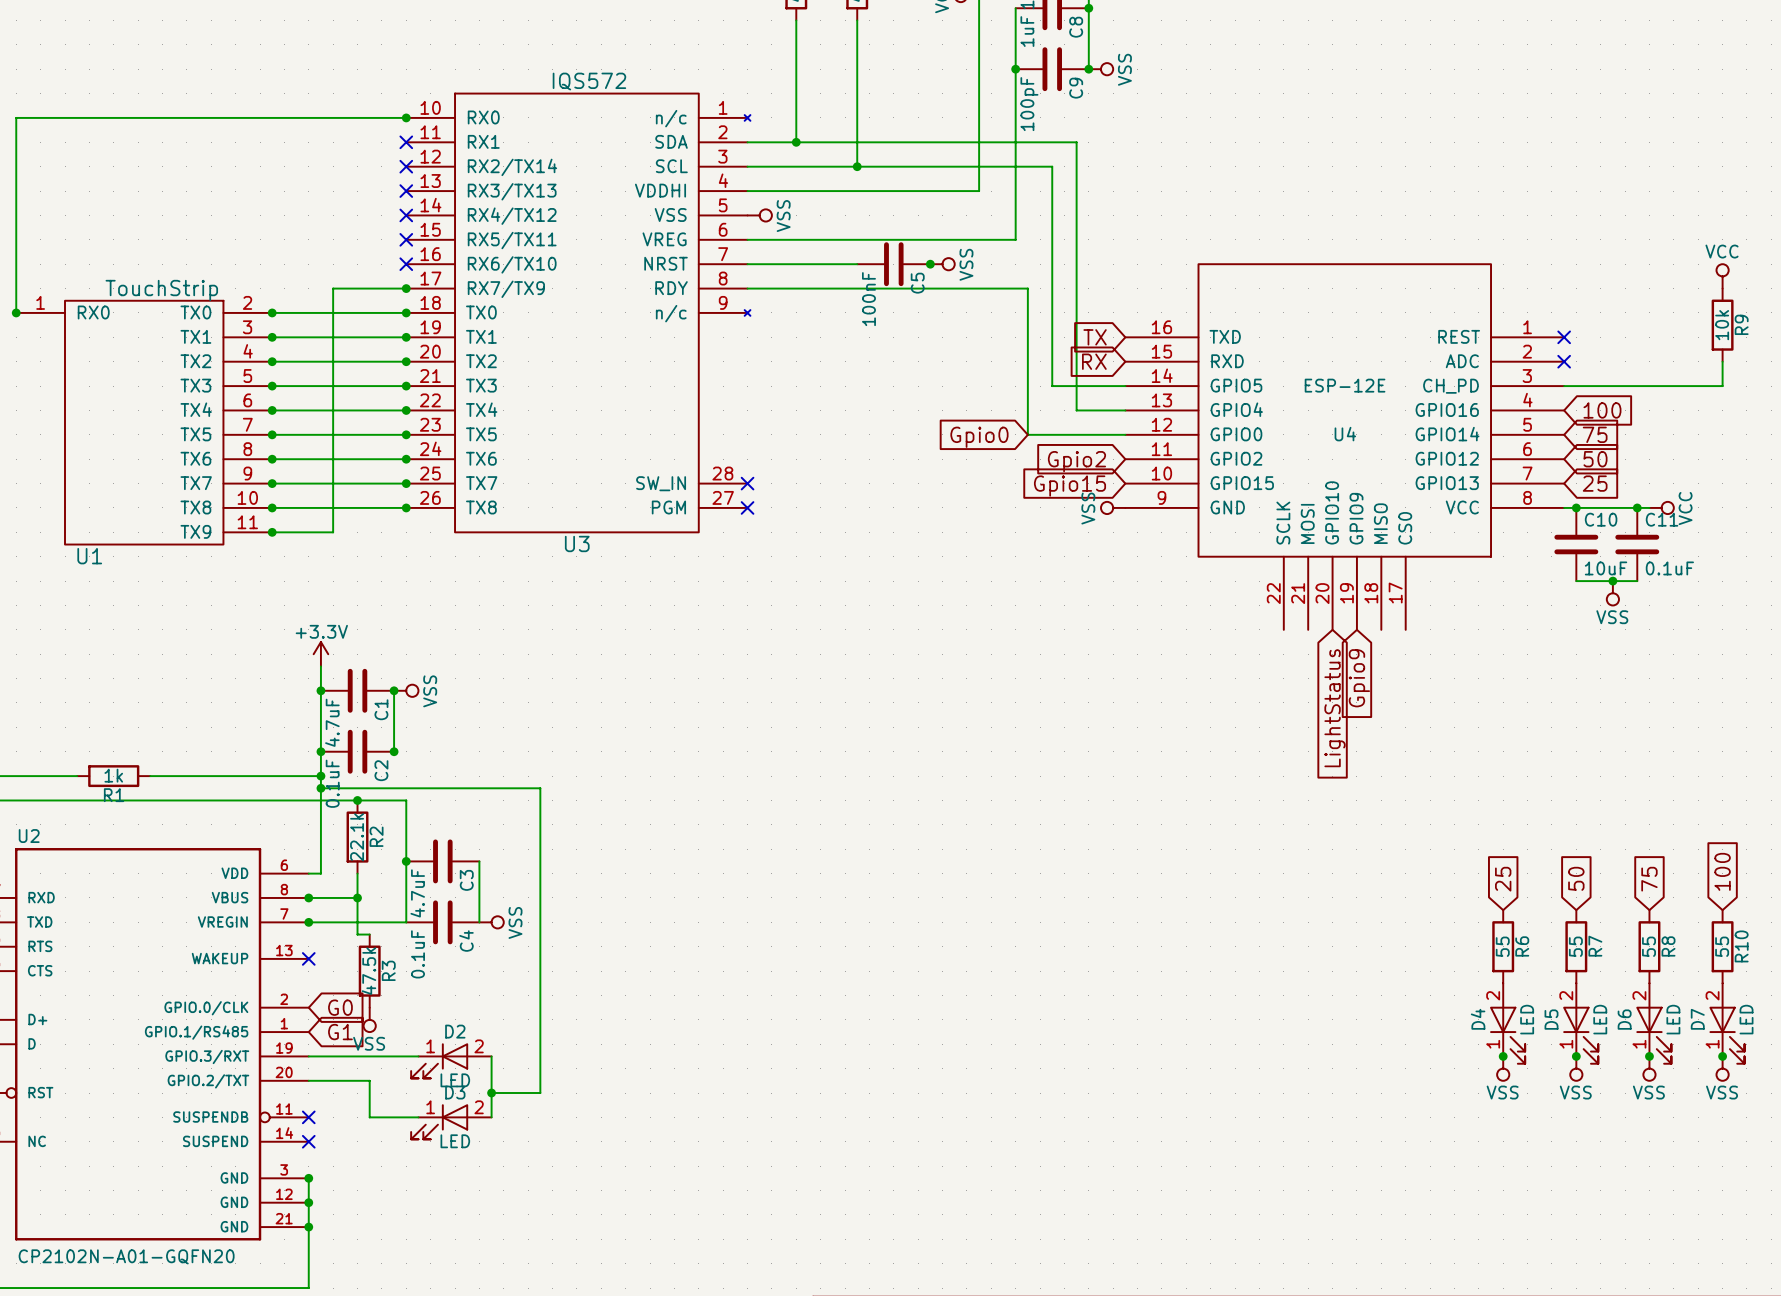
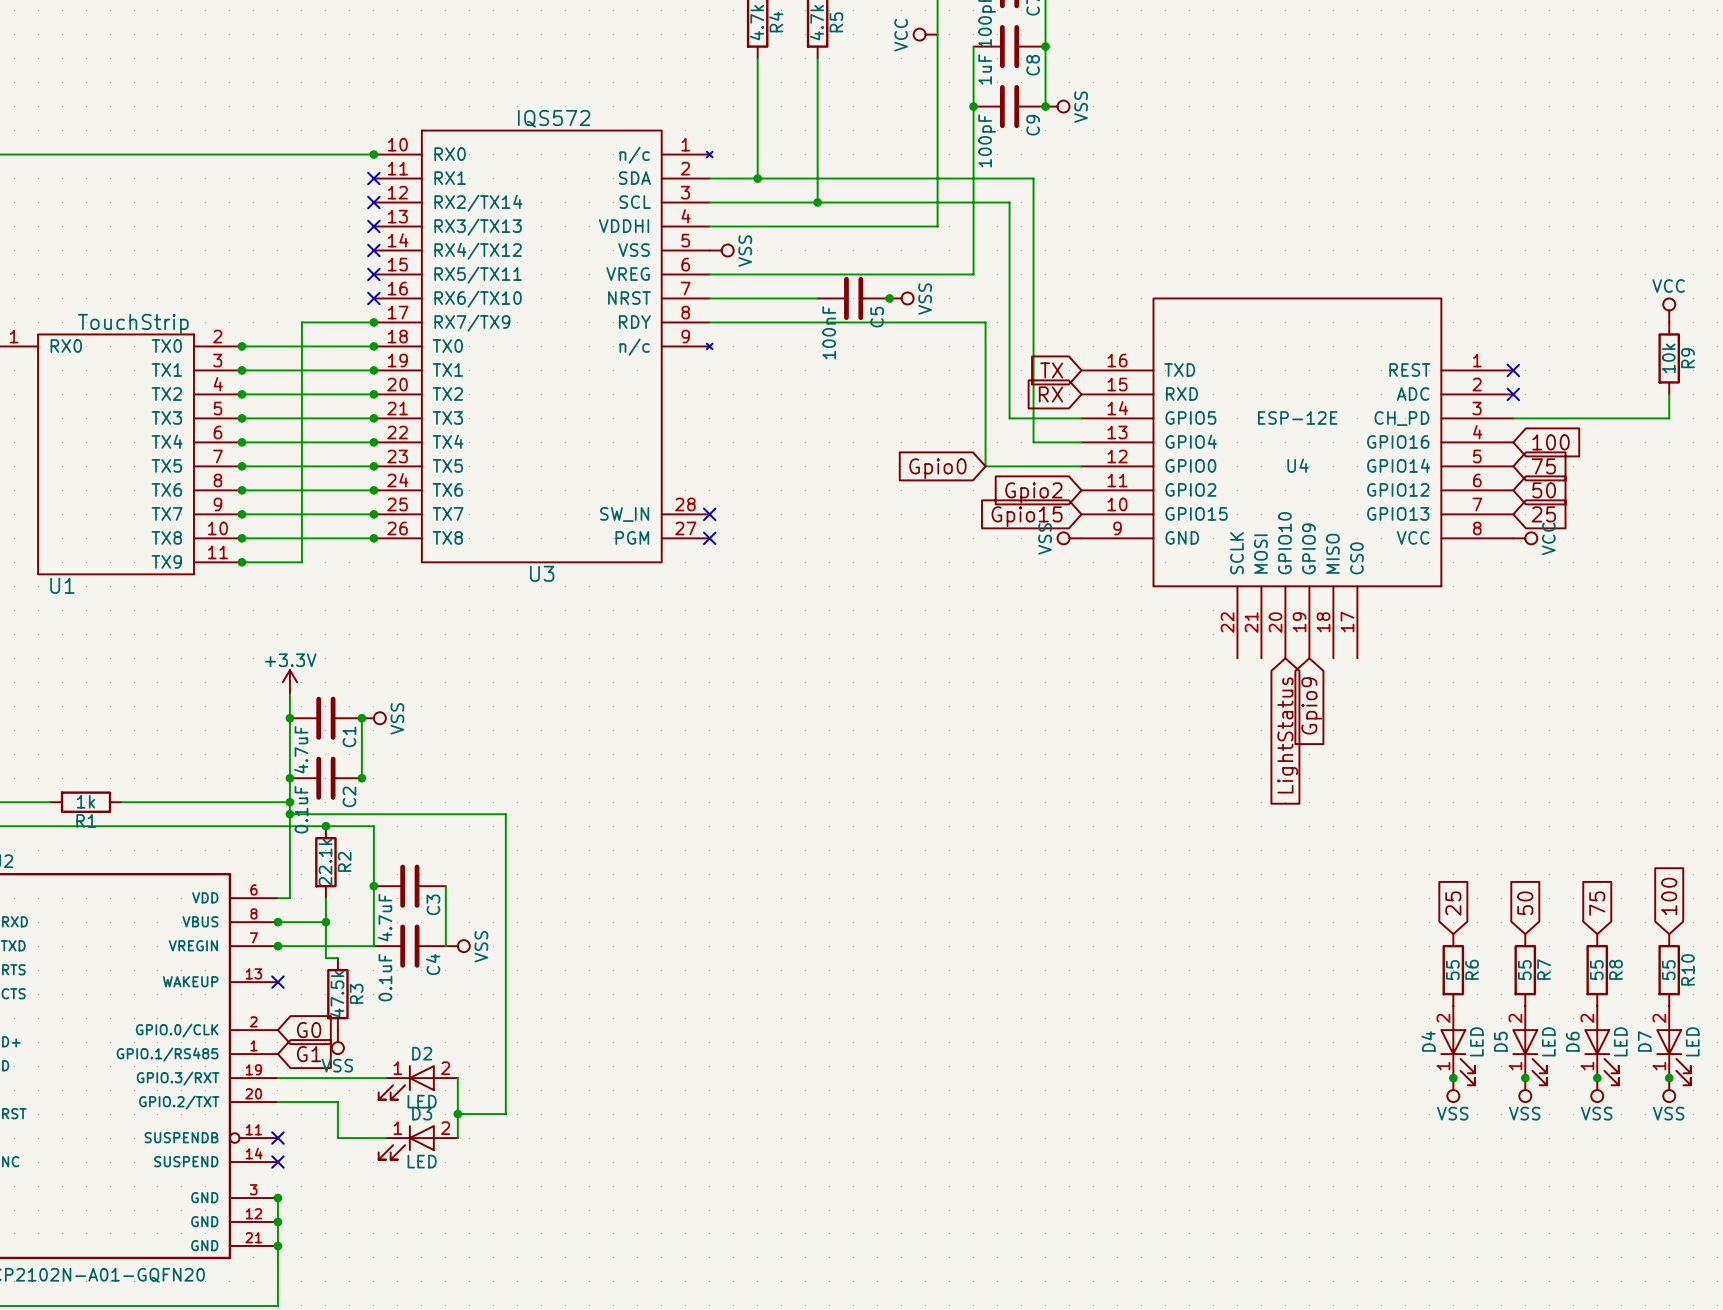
wire: (1564, 507) (1649, 507) -> none
junction: (1576, 507) -> none
junction: (1637, 507) -> none
power symbol position: VCC (1661, 507) -> VCC (1525, 538)
C10: 10uF (1576, 544) -> none
C11: 0.1uF (1637, 544) -> none
wire: (1576, 581) (1637, 581) -> none
junction: (1612, 581) -> none
power symbol: VSS (1612, 593) -> none

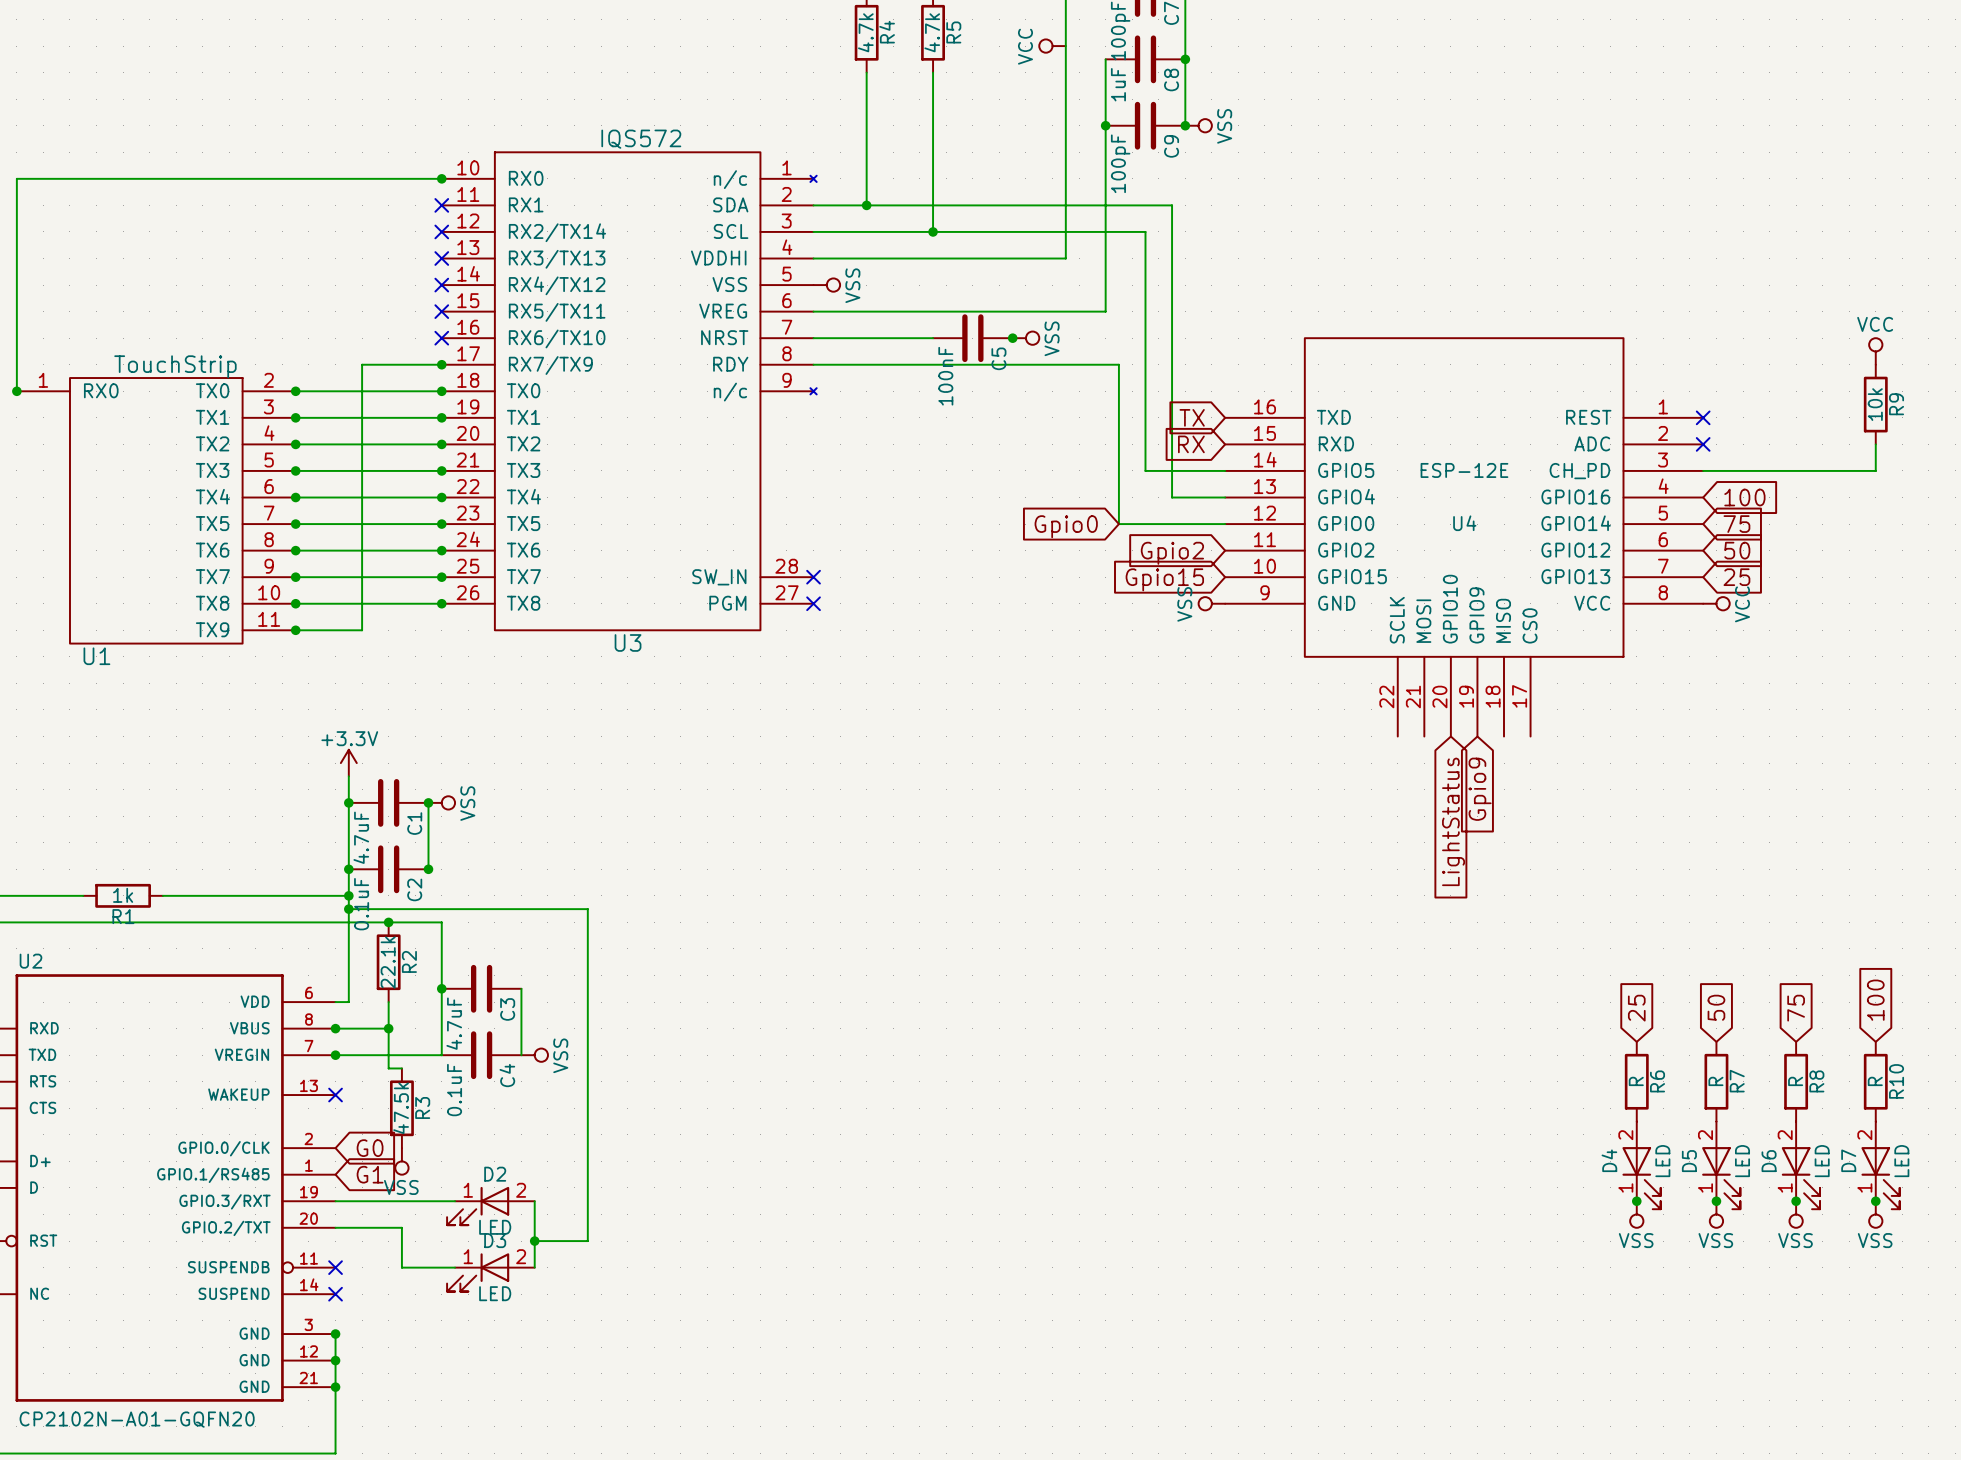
R6 value: 55 (1452, 970) -> R (1636, 1081)
R7 value: 55 (1524, 970) -> R (1715, 1081)
R8 value: 55 (1596, 970) -> R (1795, 1081)
R10 value: 55 (1668, 970) -> R (1875, 1081)

